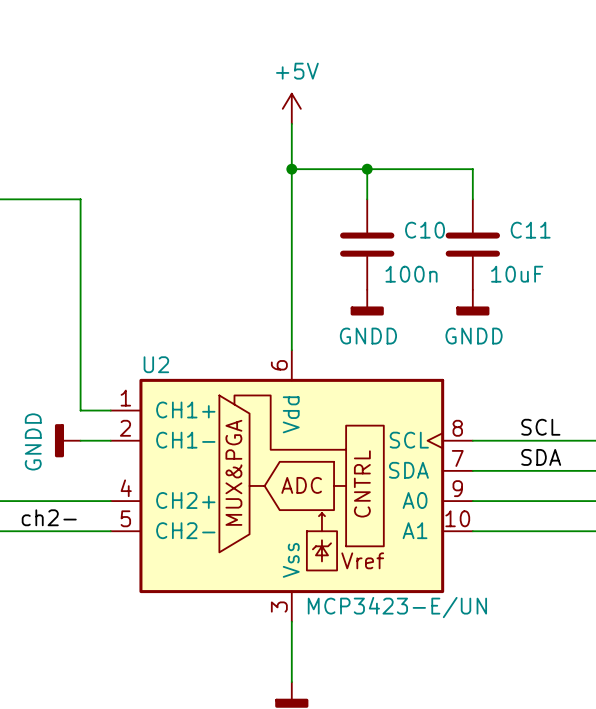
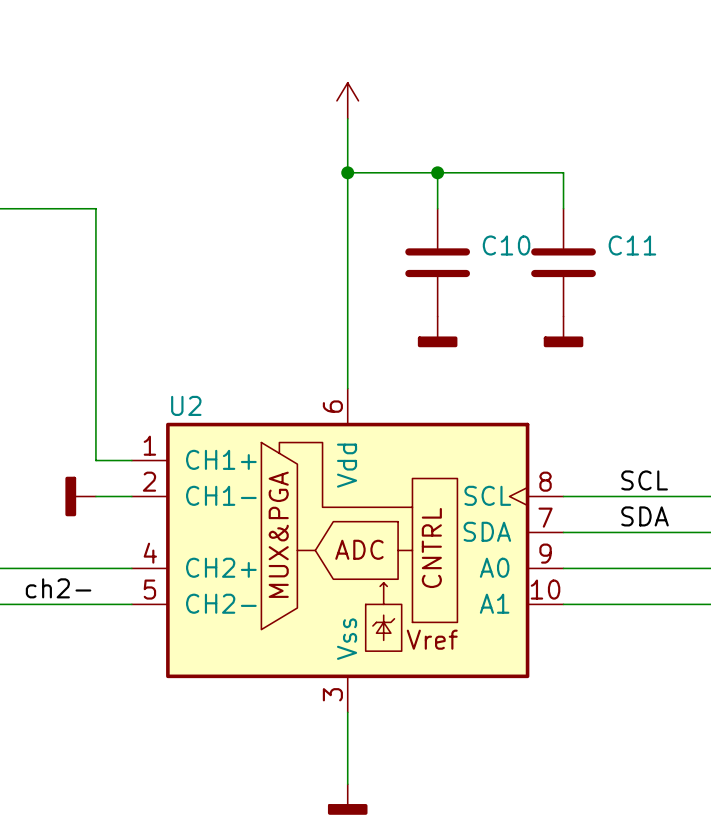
power symbol text: +5V (297, 71) -> none
C10 value: 100n (411, 274) -> none
C11 value: 10uF (517, 274) -> none
power symbol text: GNDD (368, 336) -> none
power symbol text: GNDD (474, 336) -> none
power symbol text: GNDD (33, 441) -> none
U2 value: MCP3423-E/UN (397, 607) -> none

